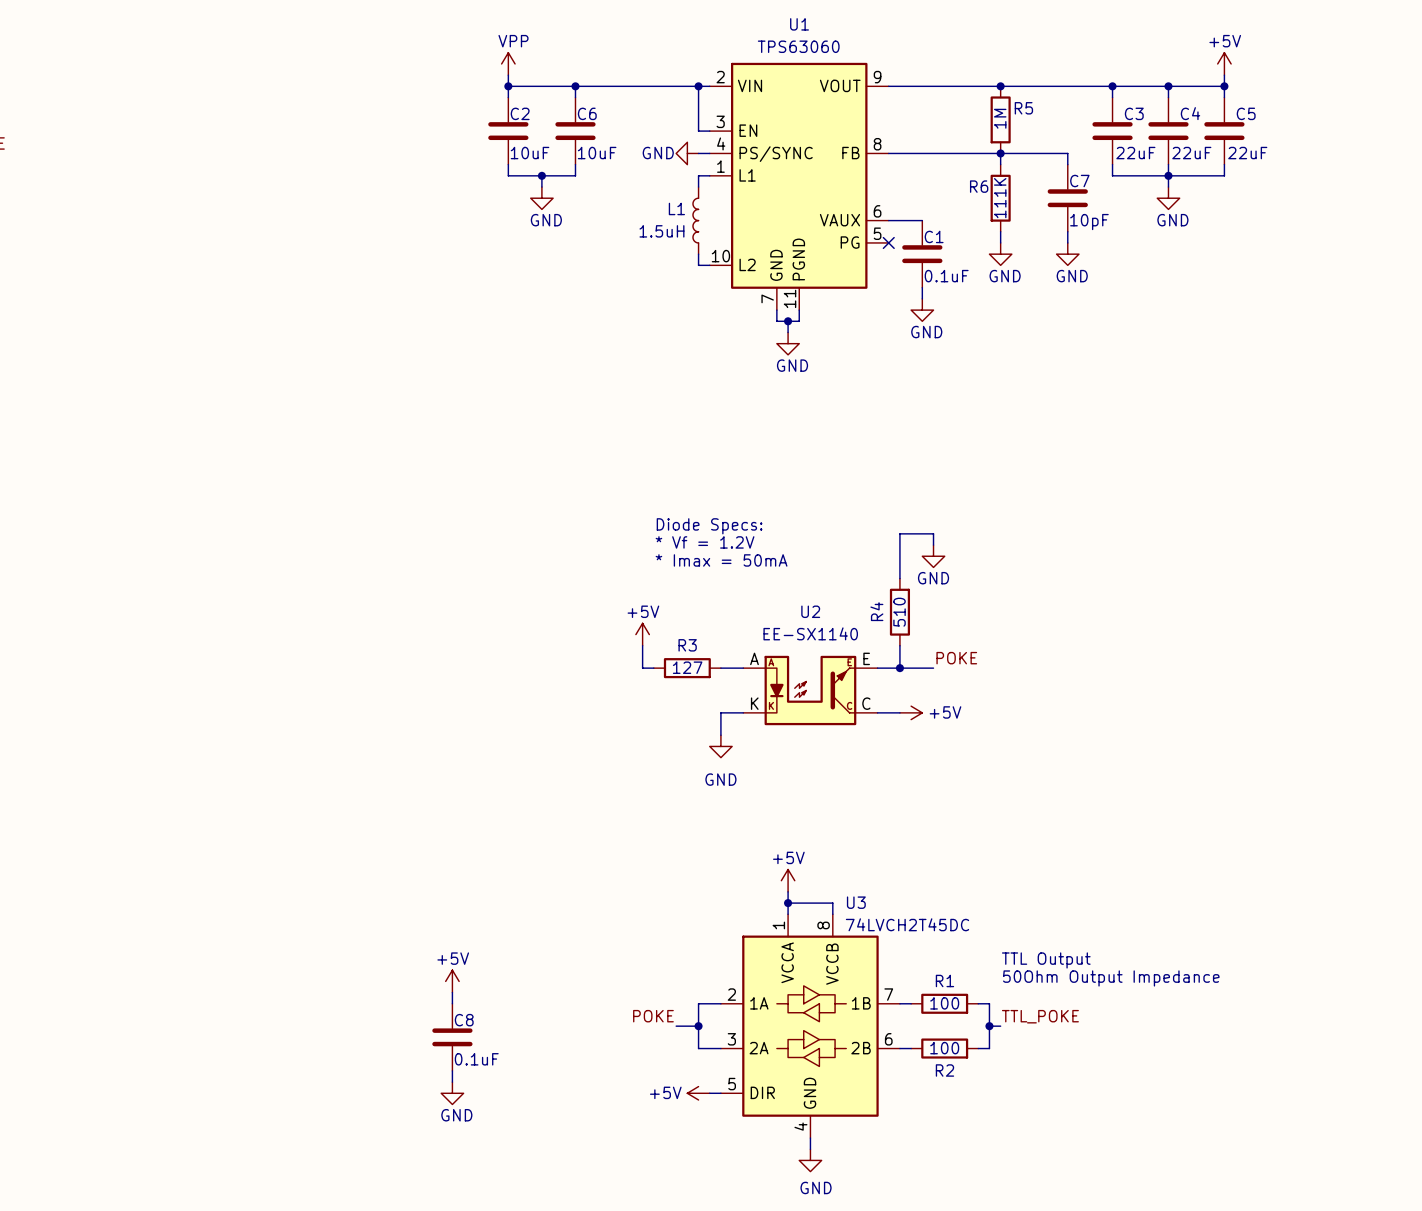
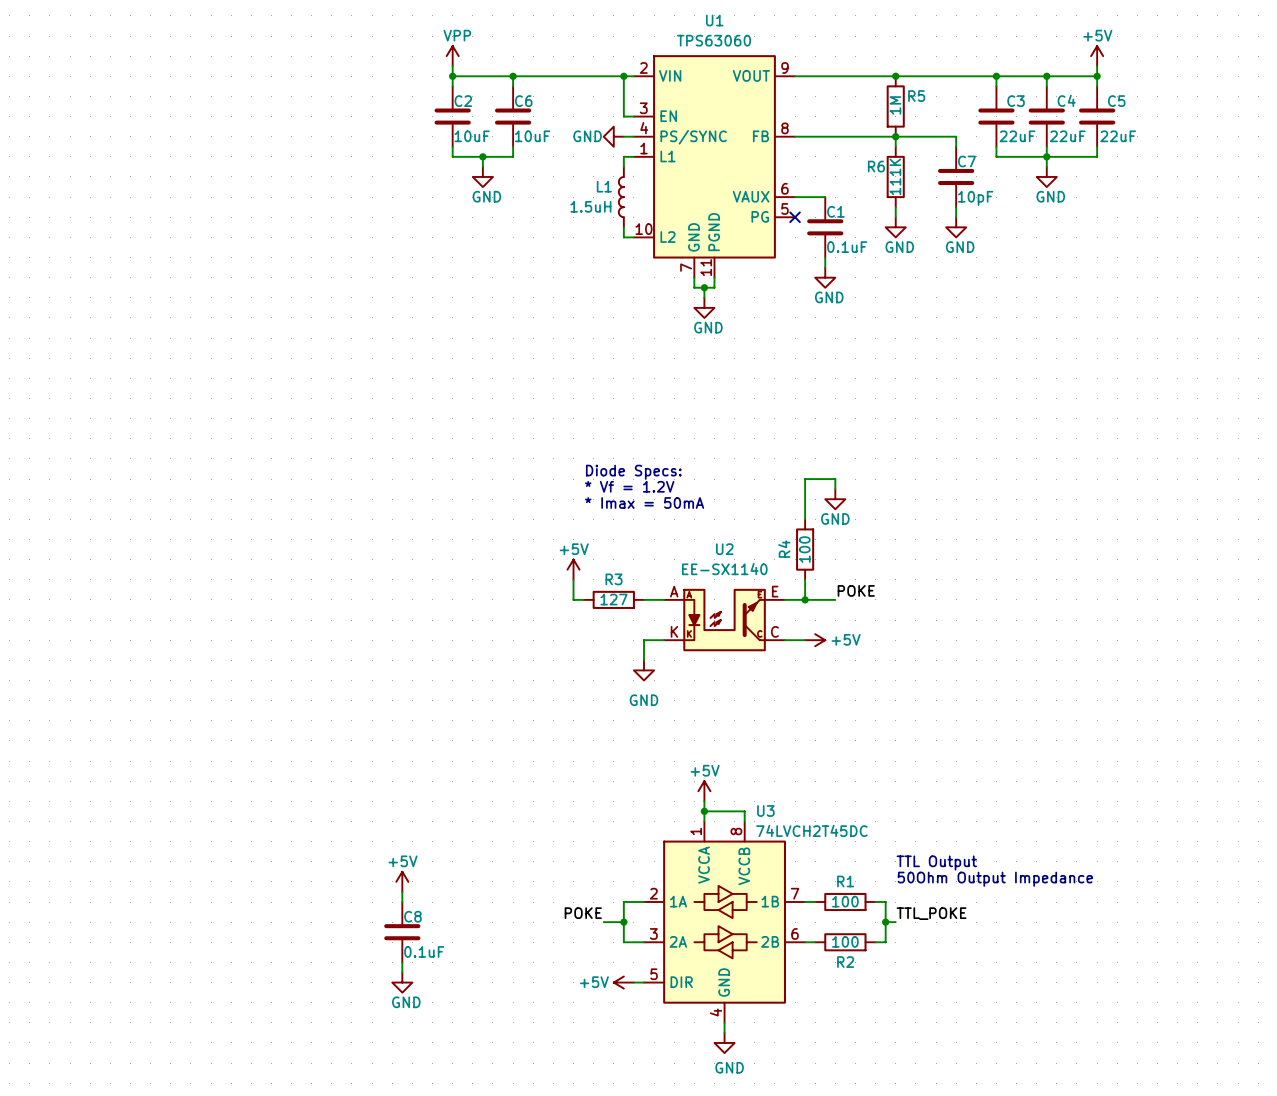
R4 value: 510 (899, 612) -> 100 (804, 549)

